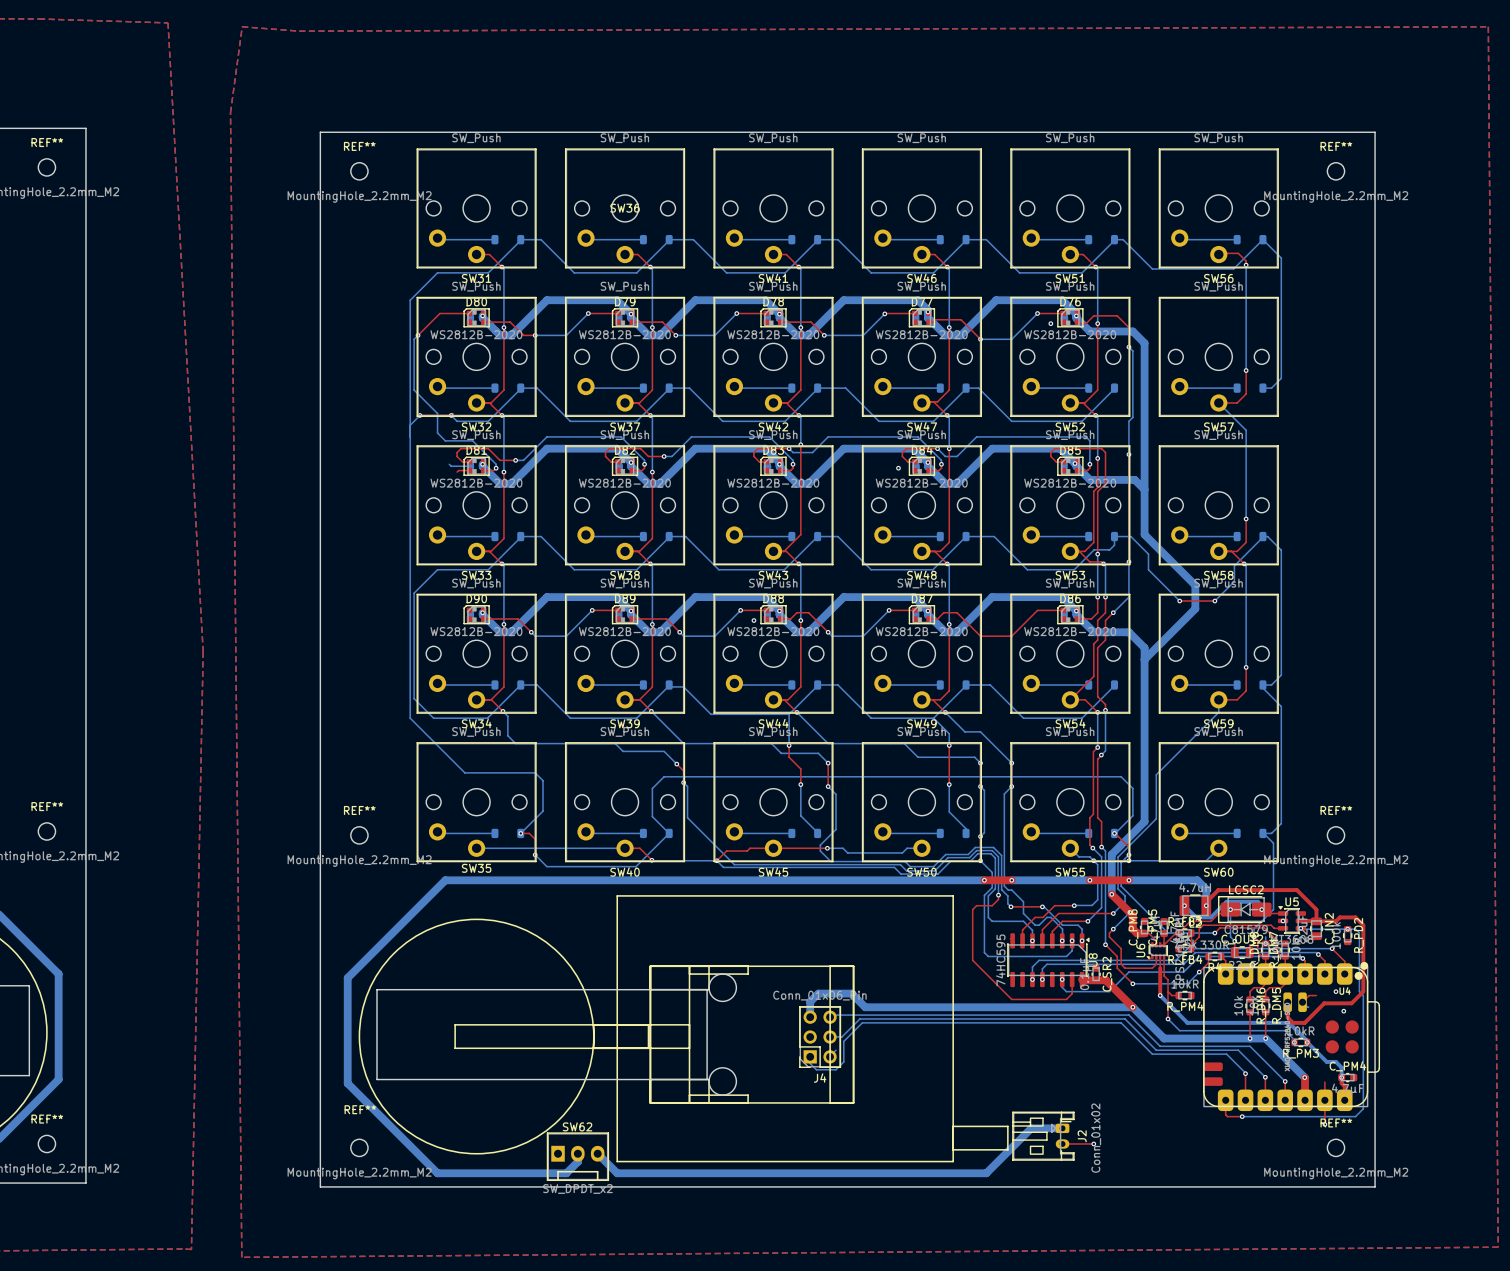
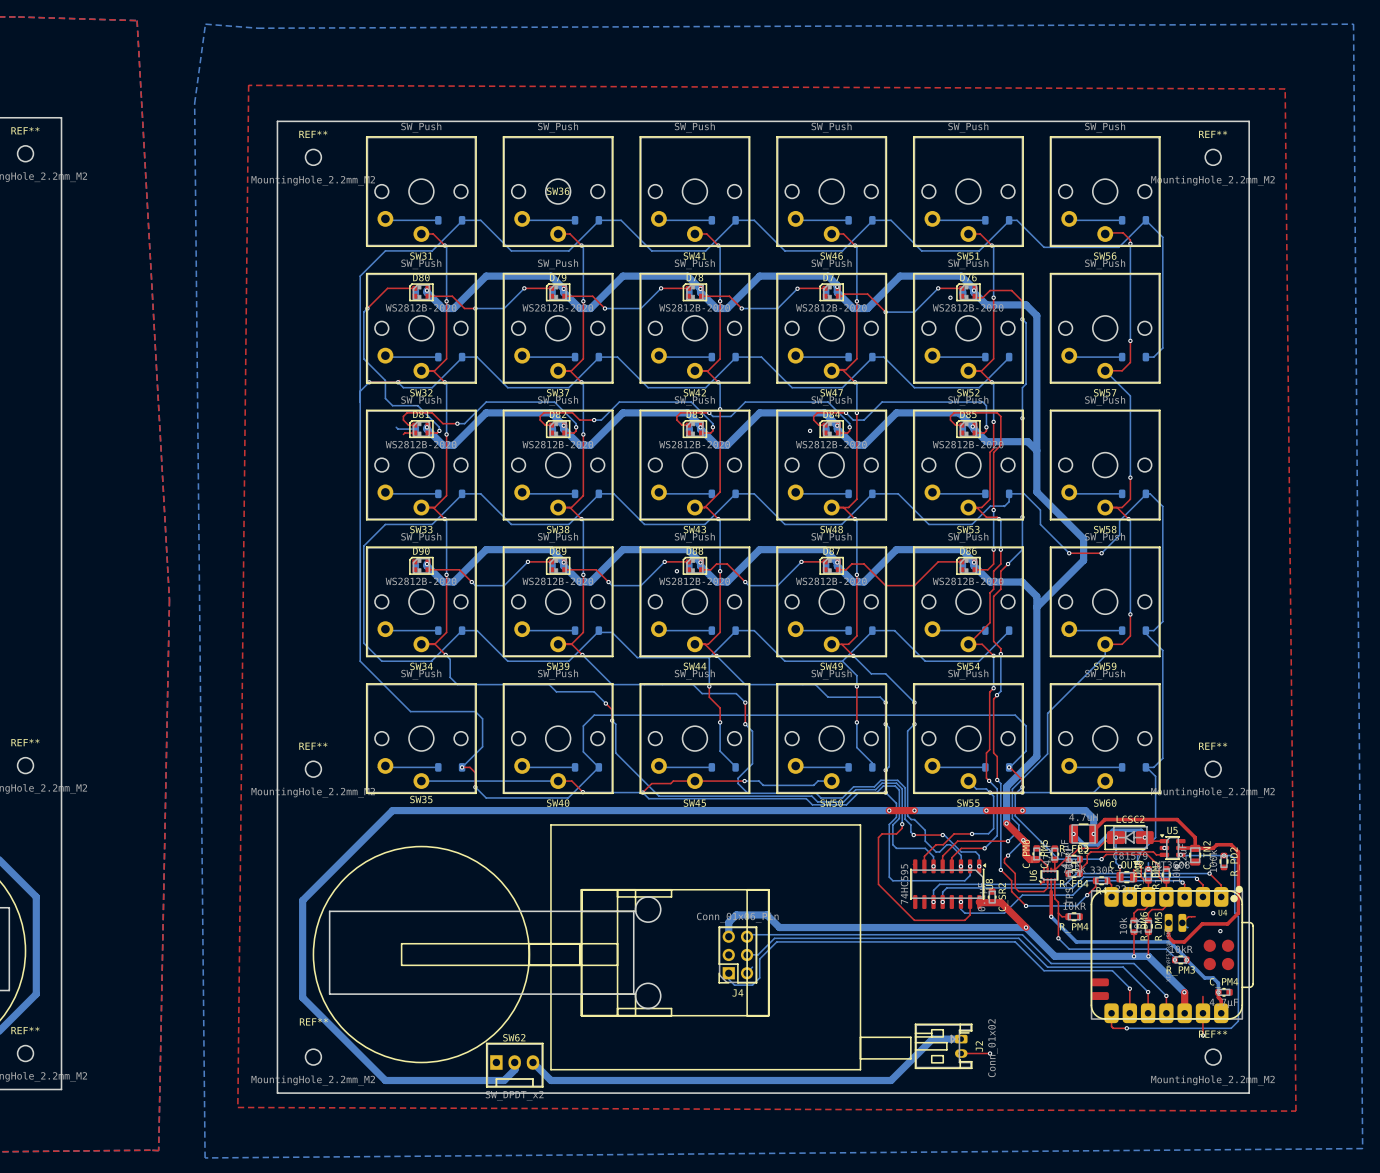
top zone outline: (242, 26) (299, 31) (1488, 26) (1498, 1247) (241, 1257) (230, 112) (242, 26) -> (248, 85) (237, 1107) (1295, 1111) (1285, 88) (248, 85)

